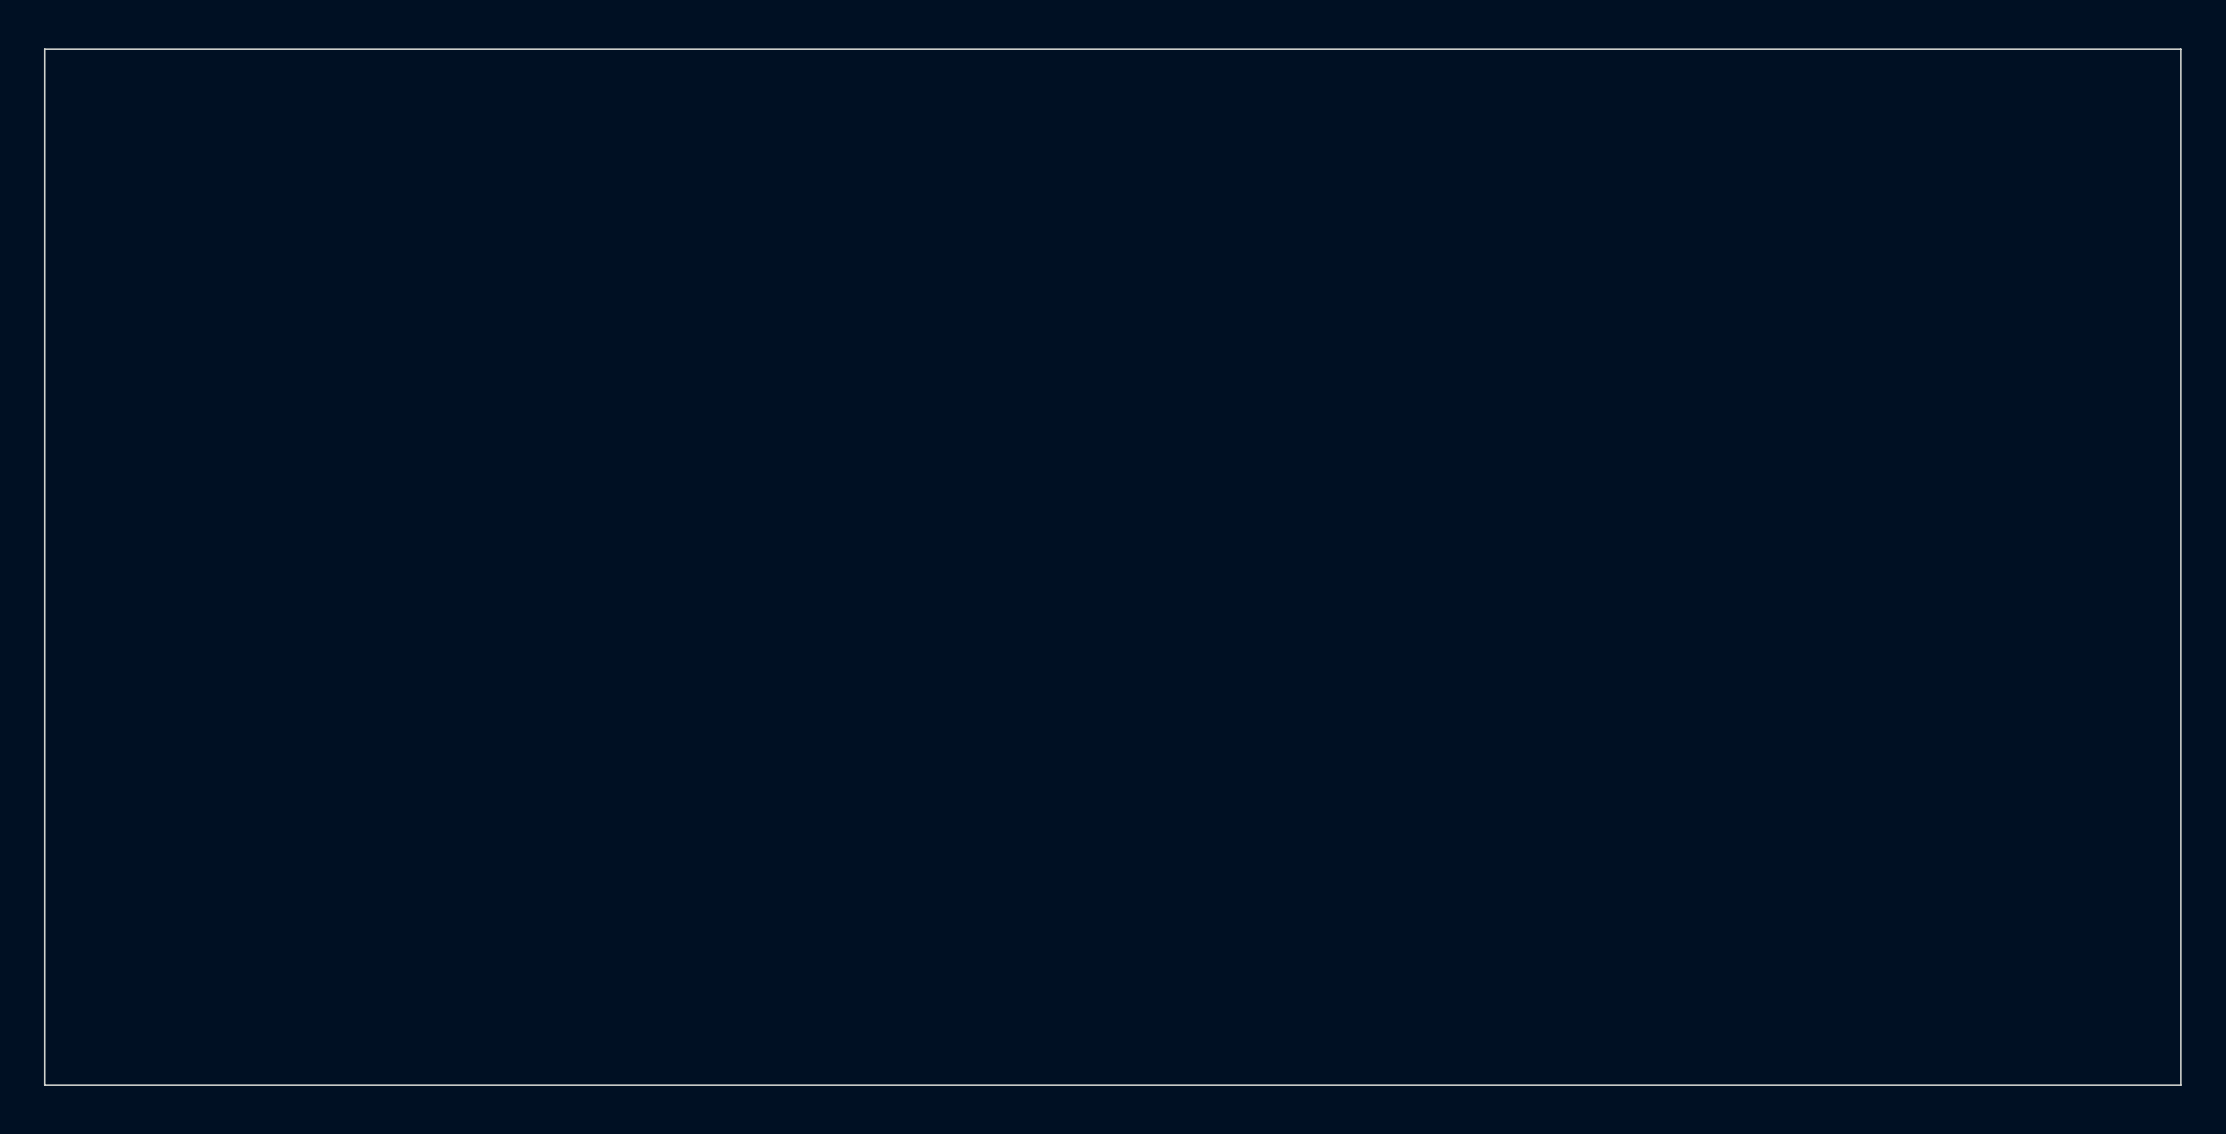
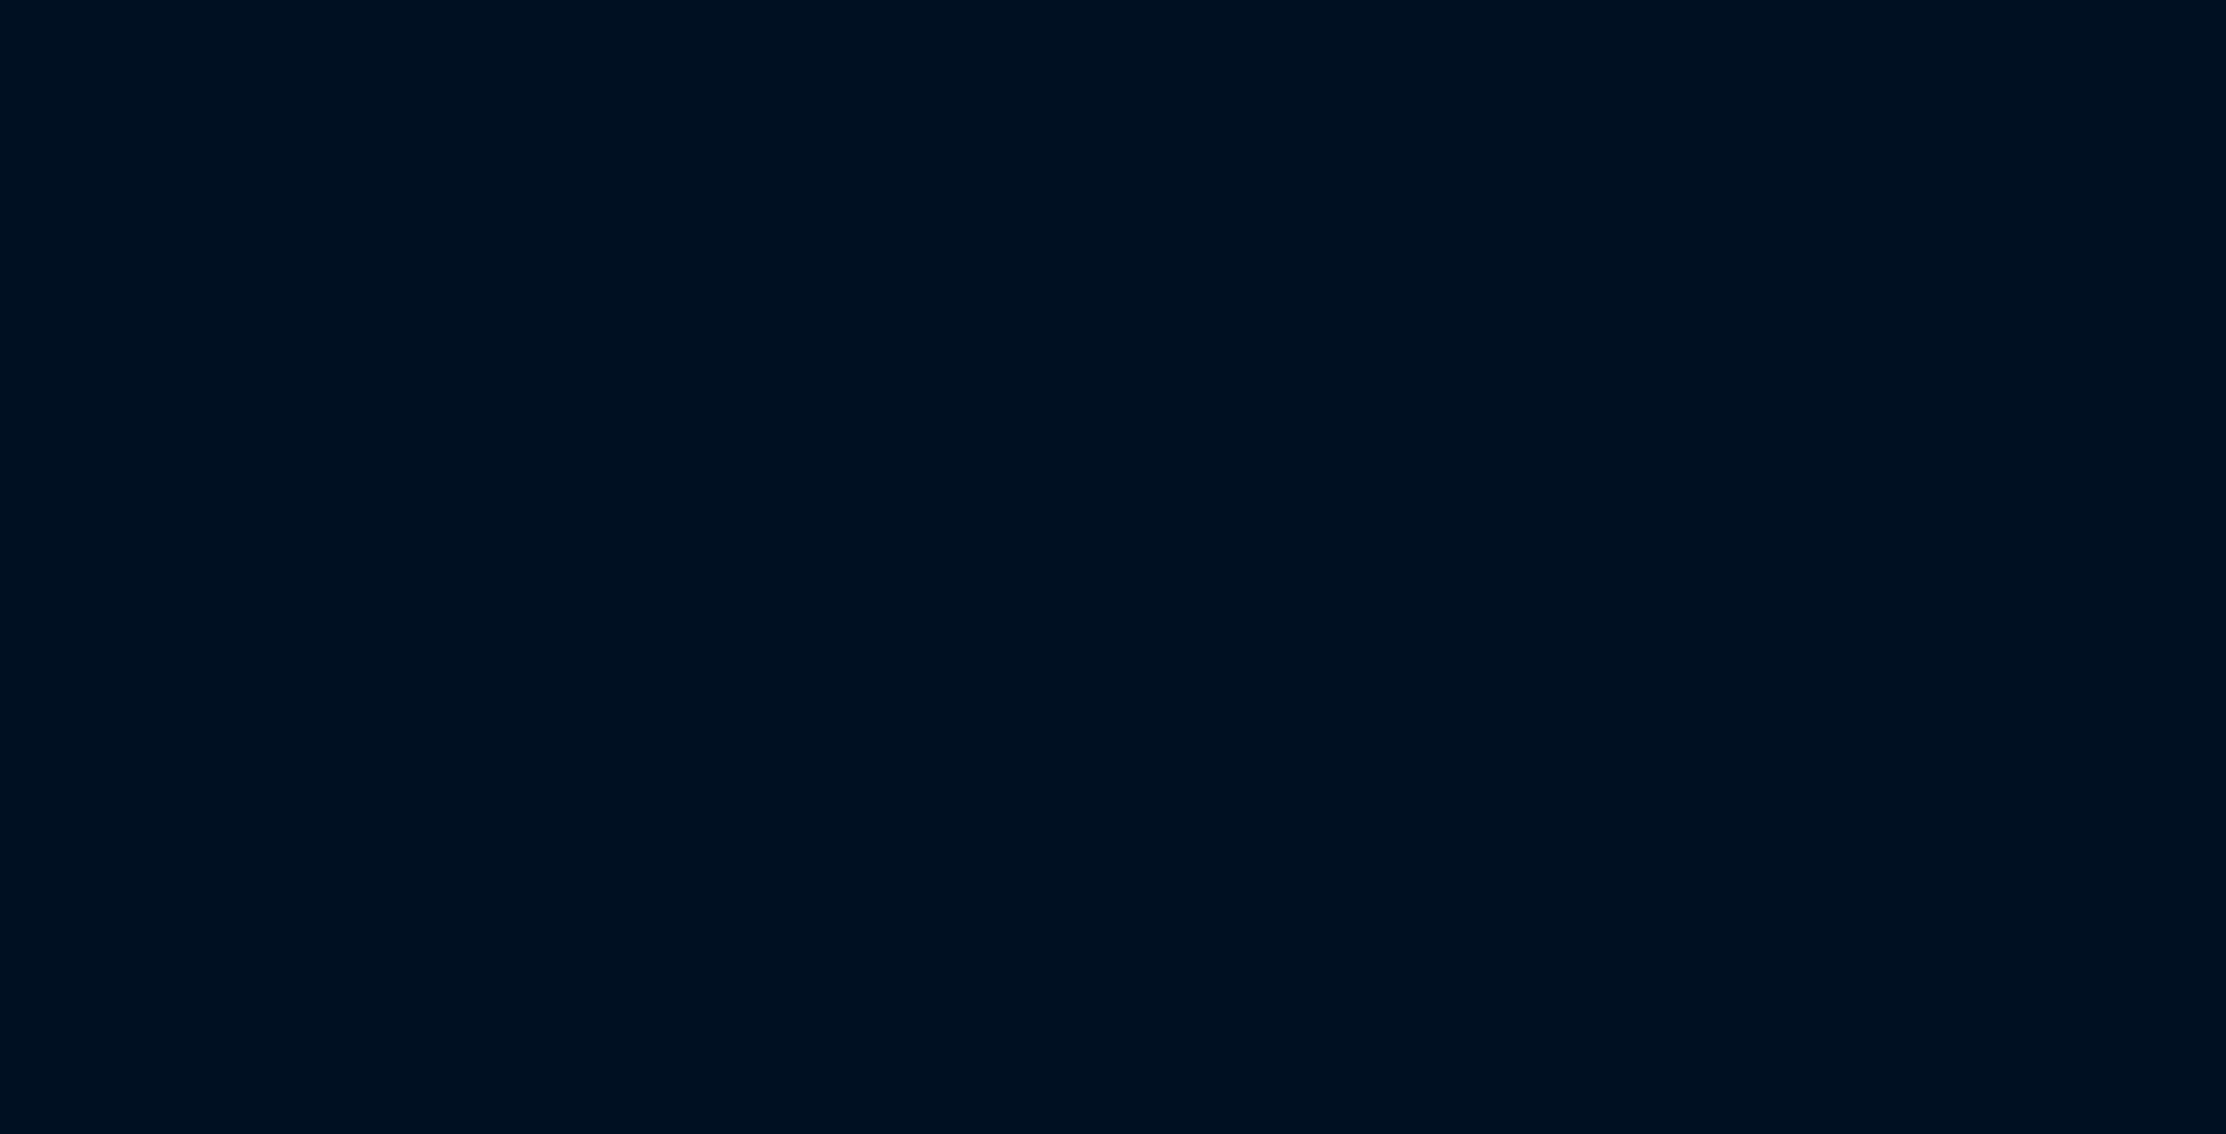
board edge: (2180, 49) (44, 49) (44, 1085) (2180, 1085) (2180, 49) -> none

